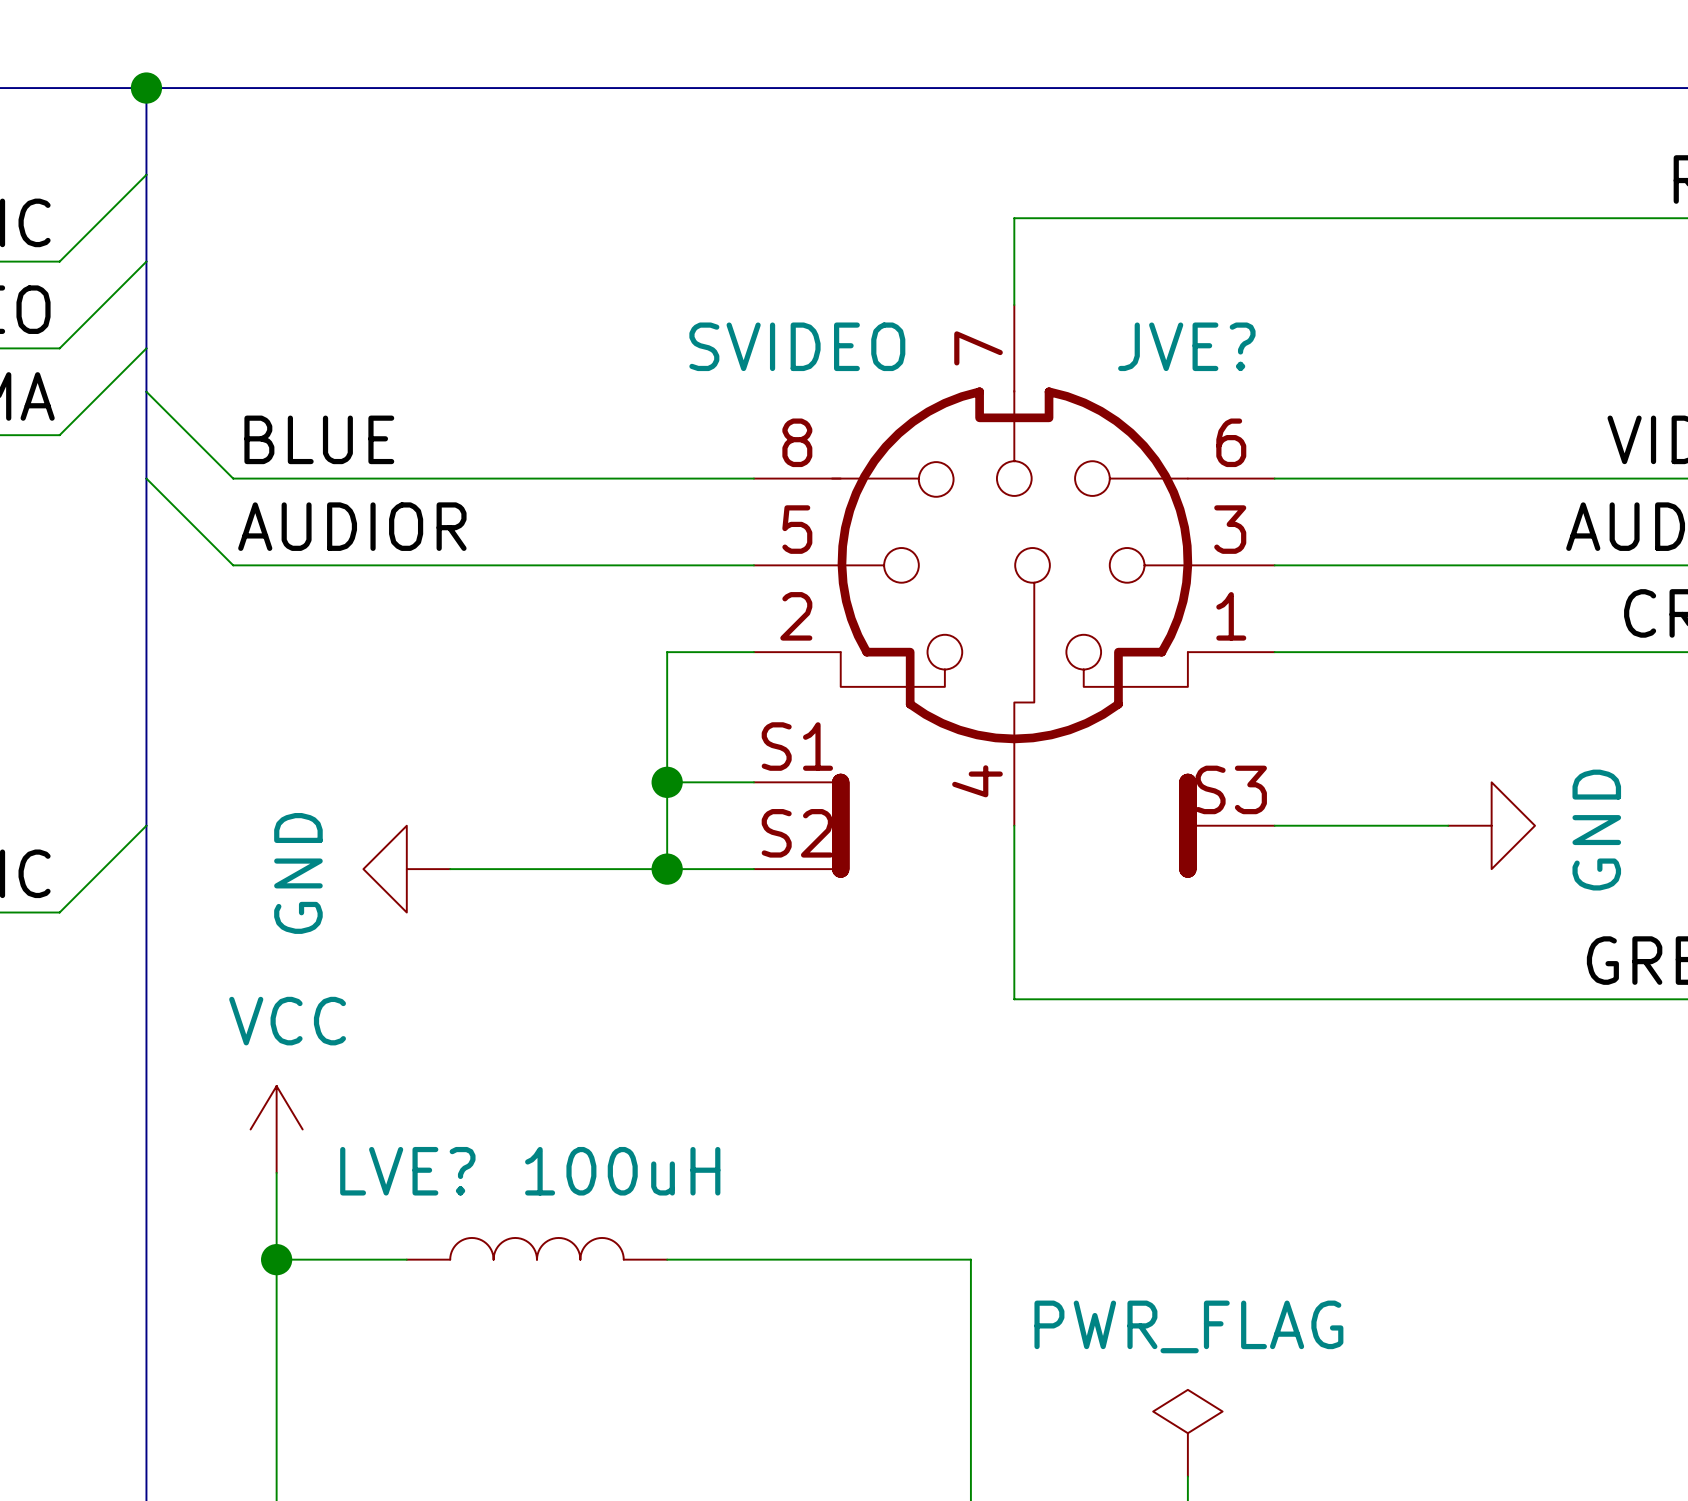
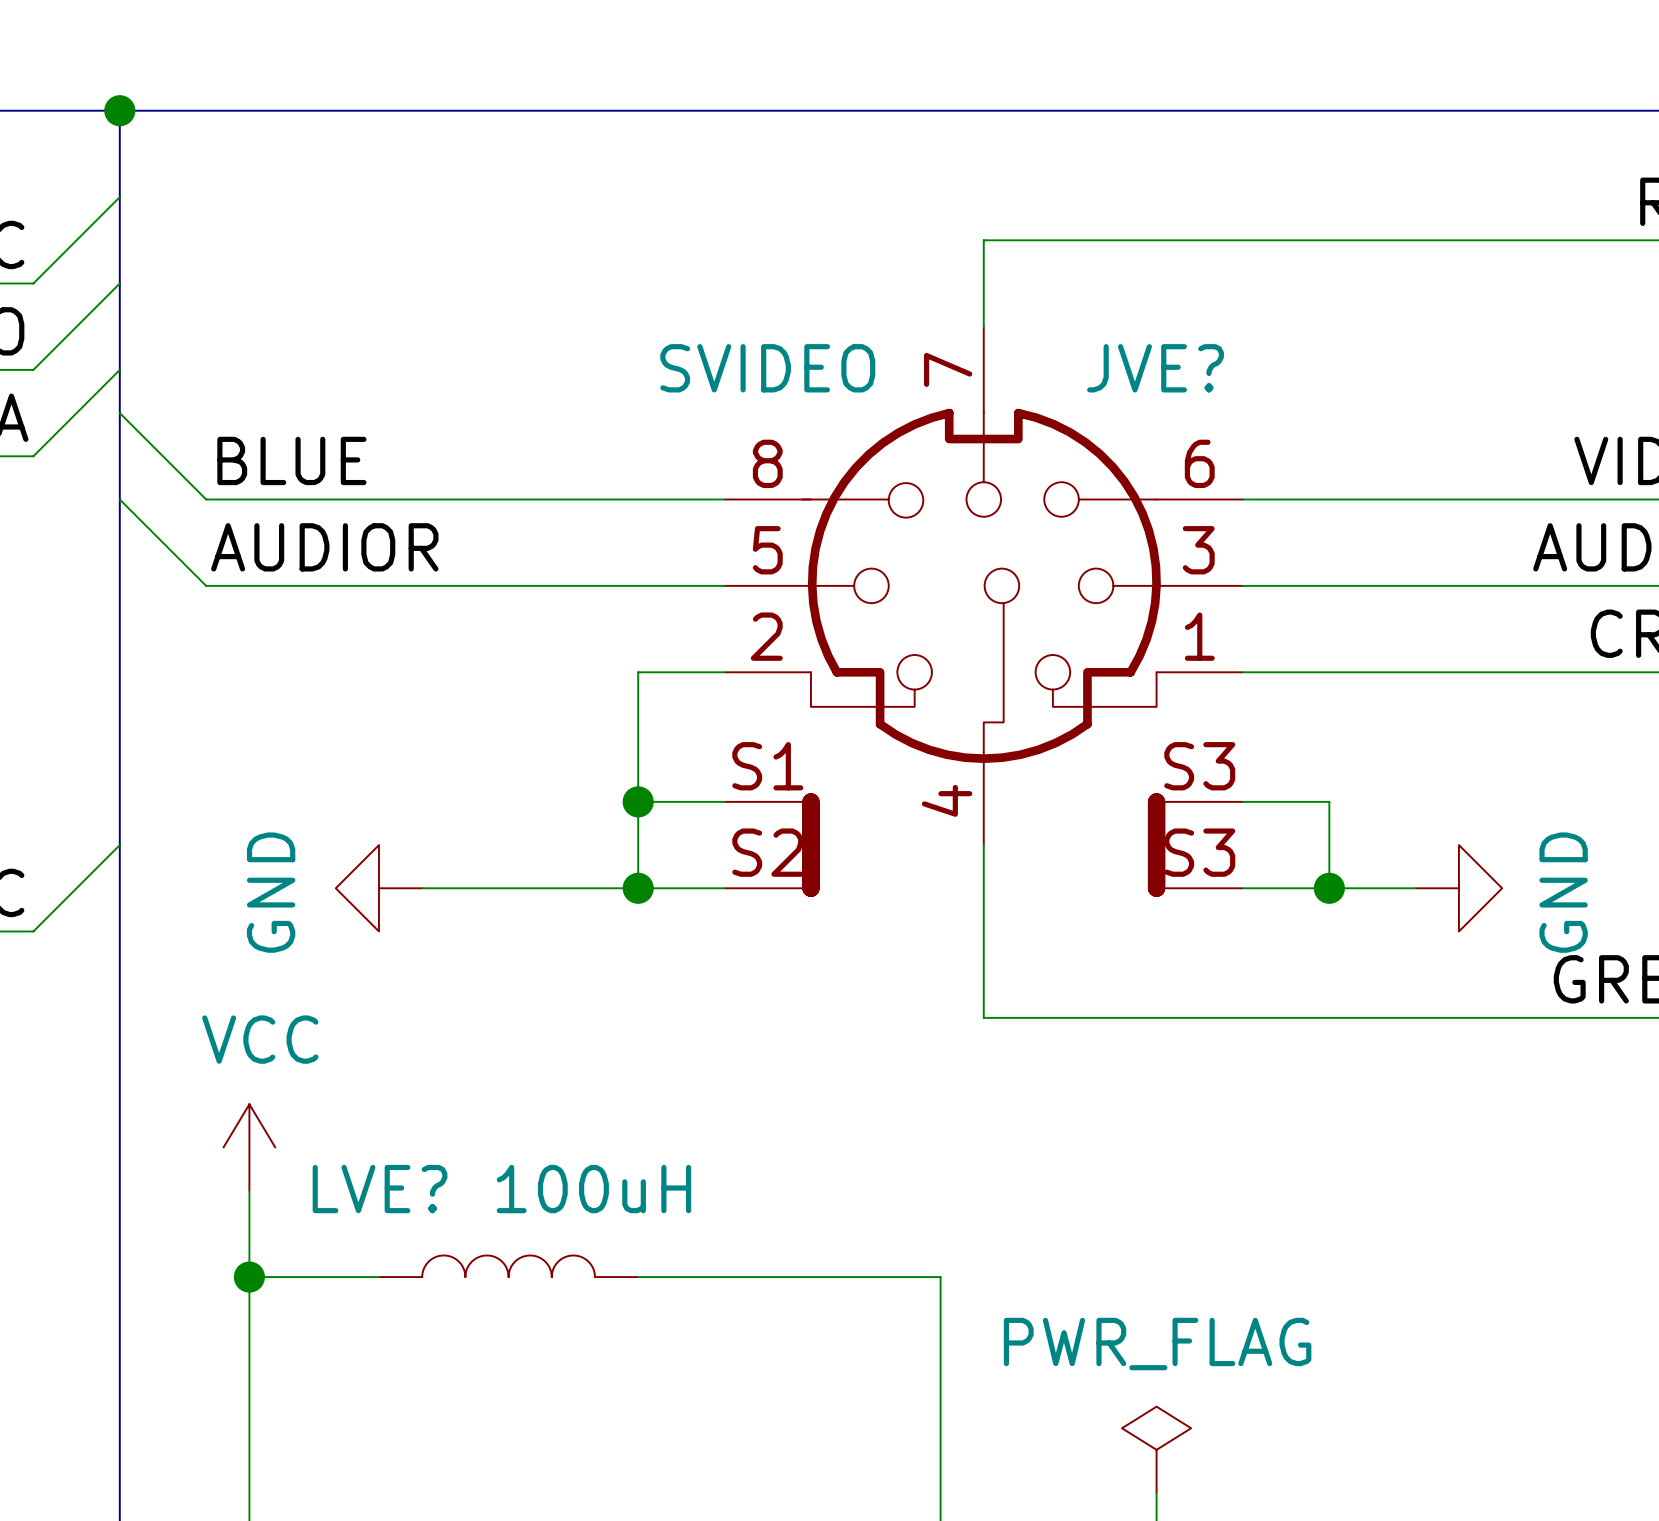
JVE? symbol: [753, 305, 1275, 878] -> [724, 326, 1243, 897]
wire: none -> (1242, 801) (1329, 801) (1329, 888)
wire: (1274, 825) (1448, 825) -> (1242, 888) (1415, 888)
power symbol position: GND (1491, 825) -> GND (1458, 888)
junction: none -> (1329, 888)

